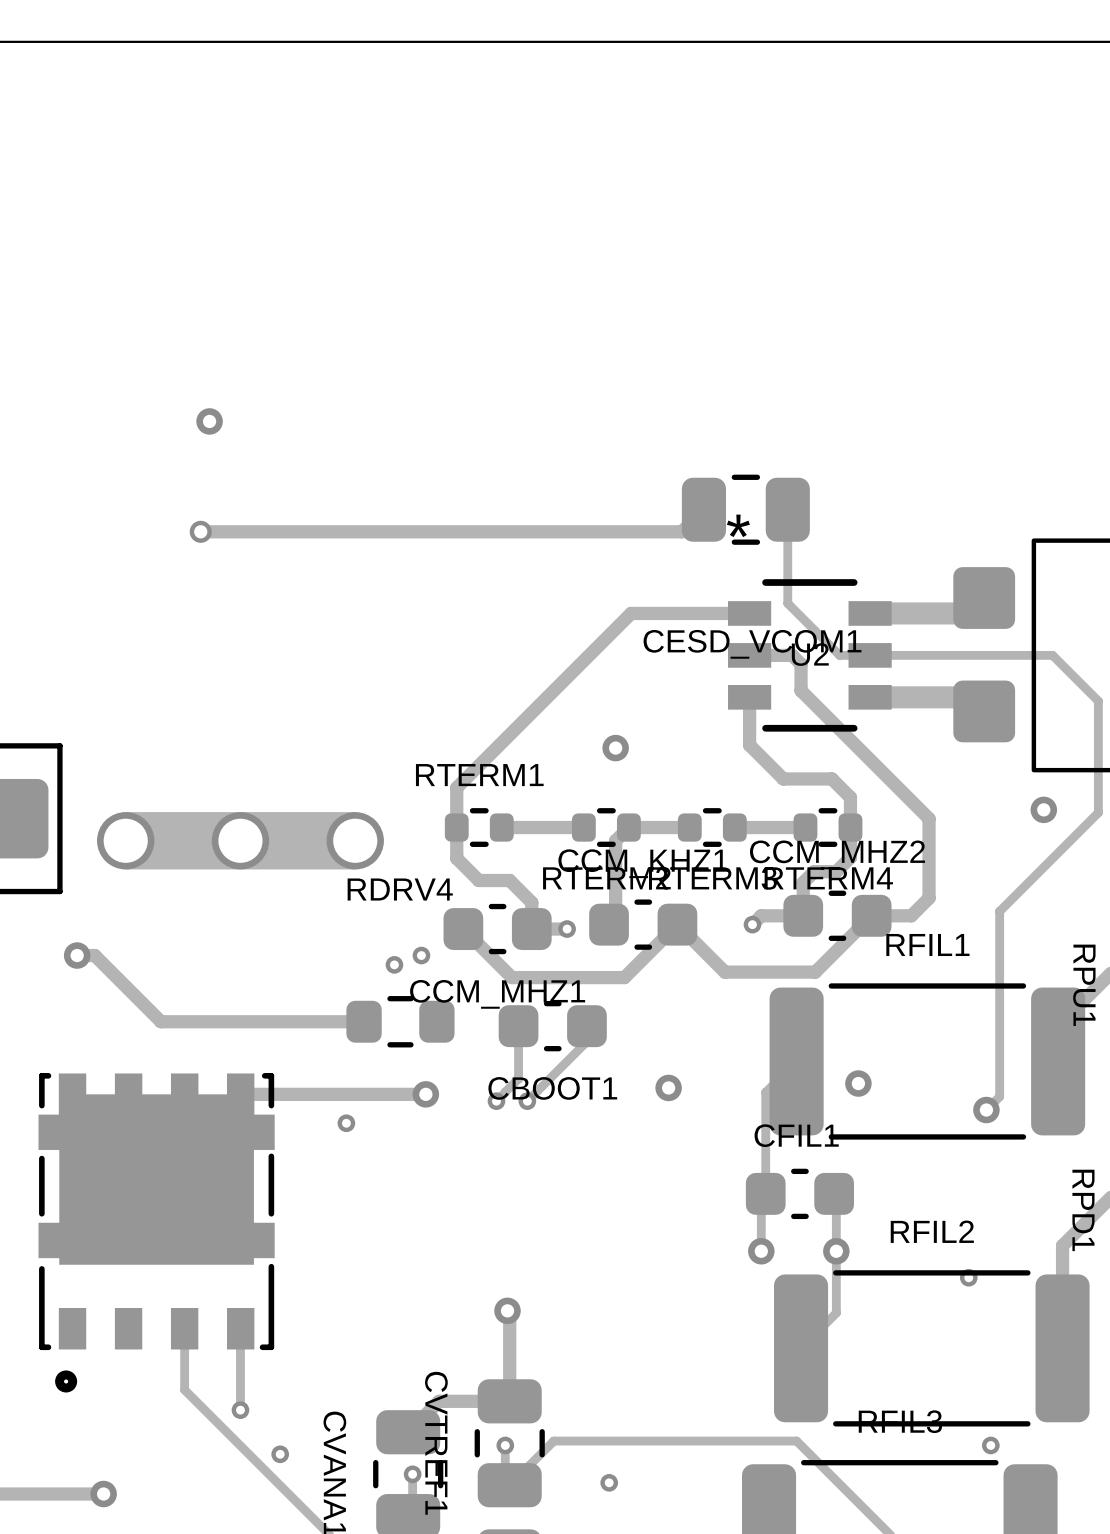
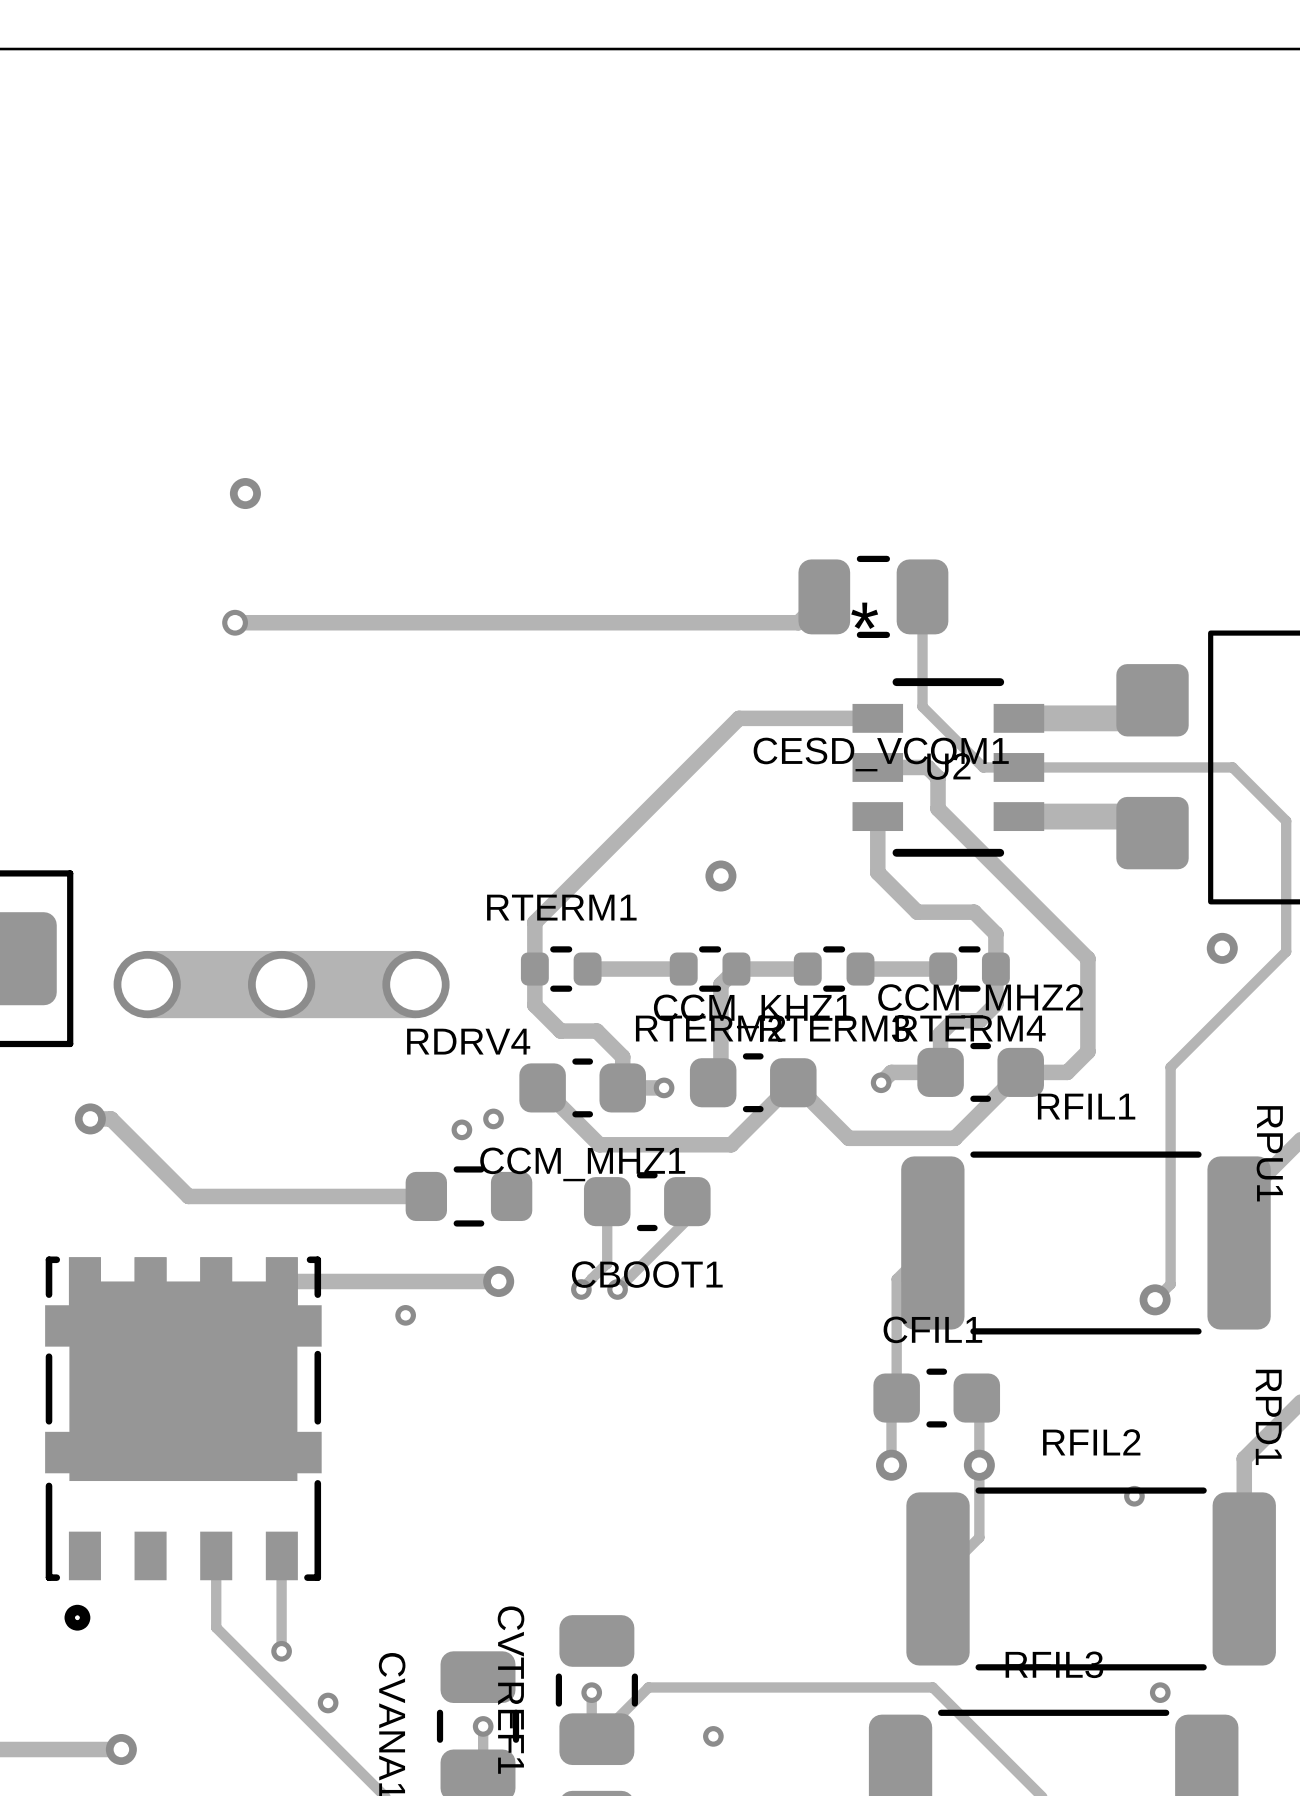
via: (858, 1083) -> none
via: (668, 1087) -> none
track: (507, 1310) (509, 1313) (509, 1401) (439, 1401) (408, 1432) -> none
via: (507, 1310) -> none

